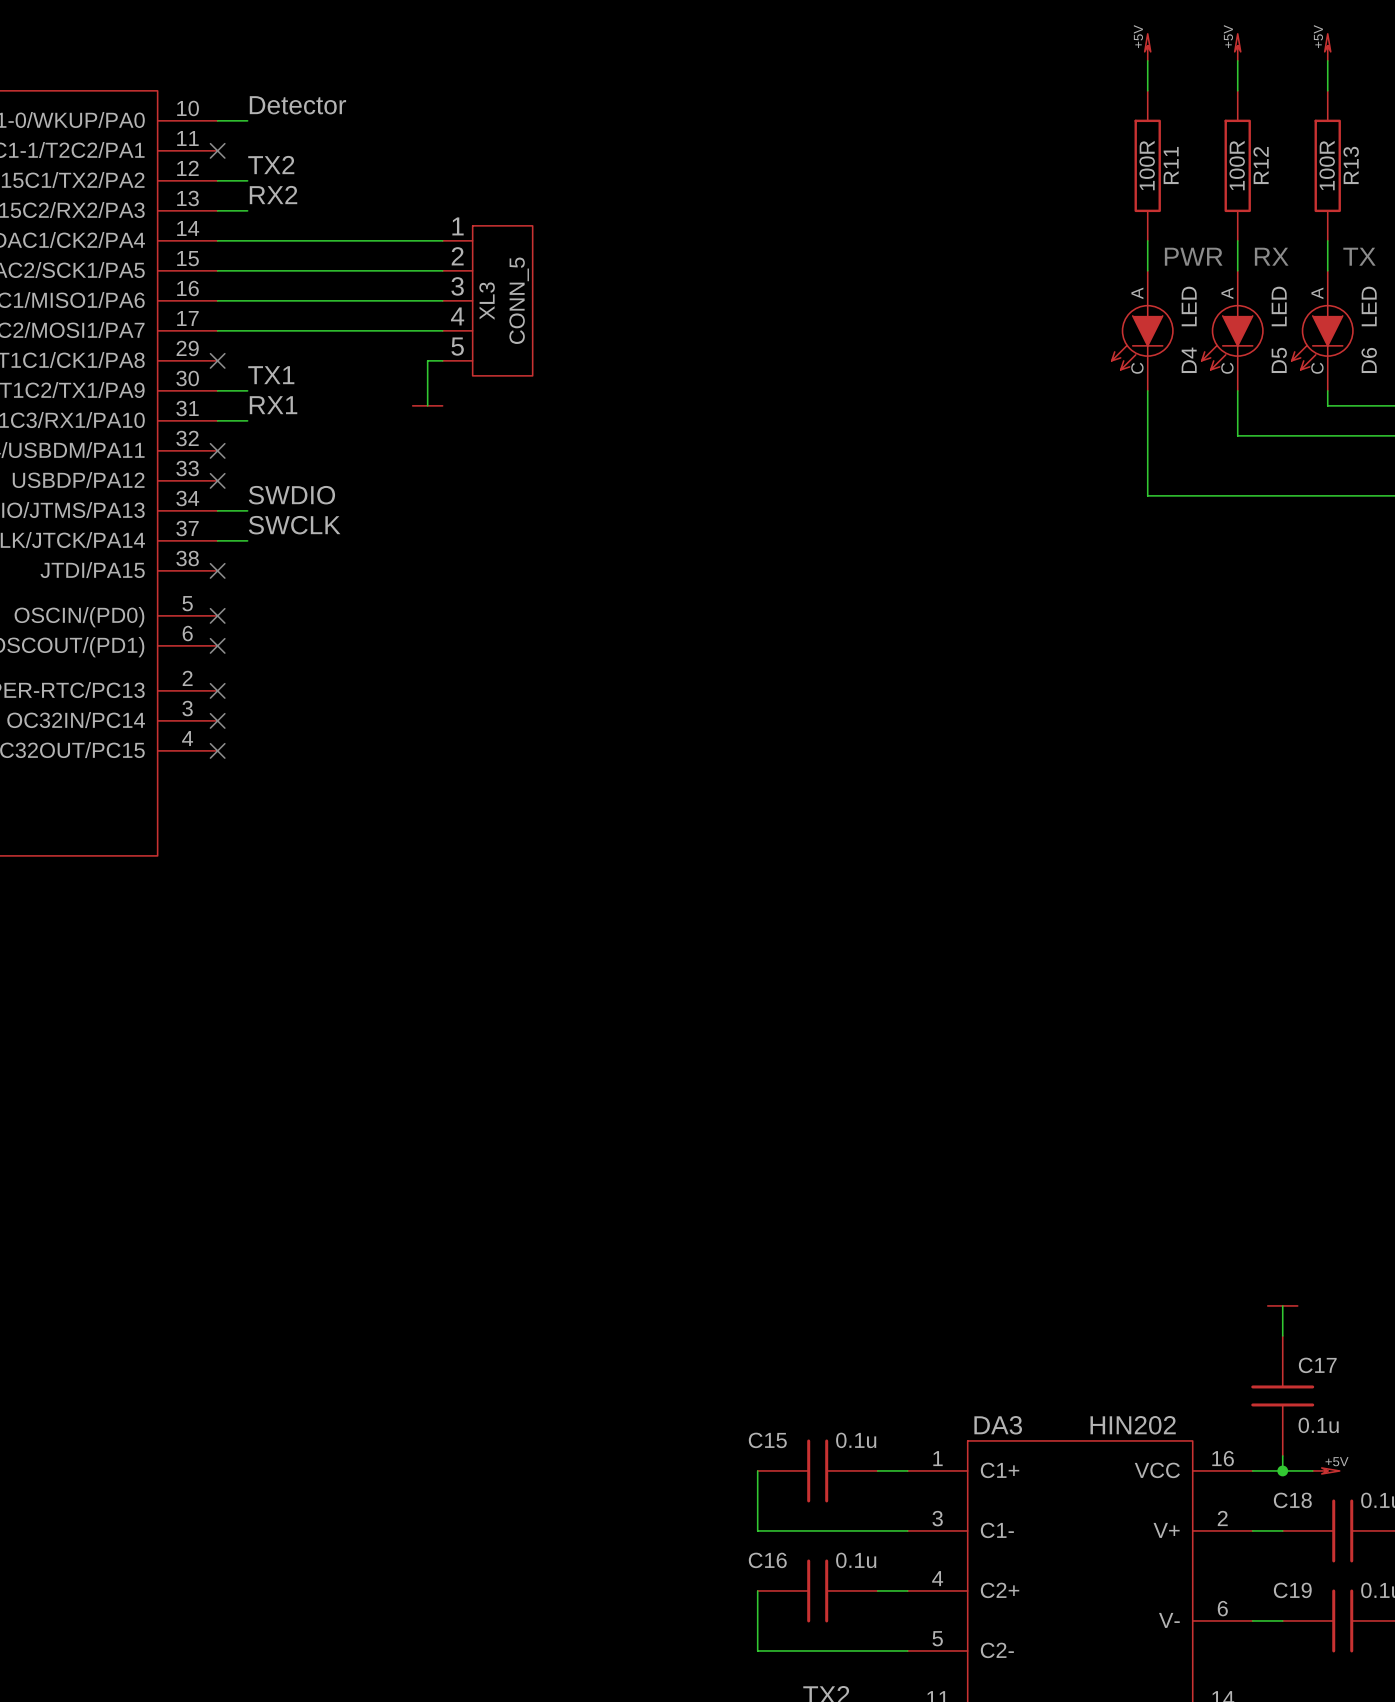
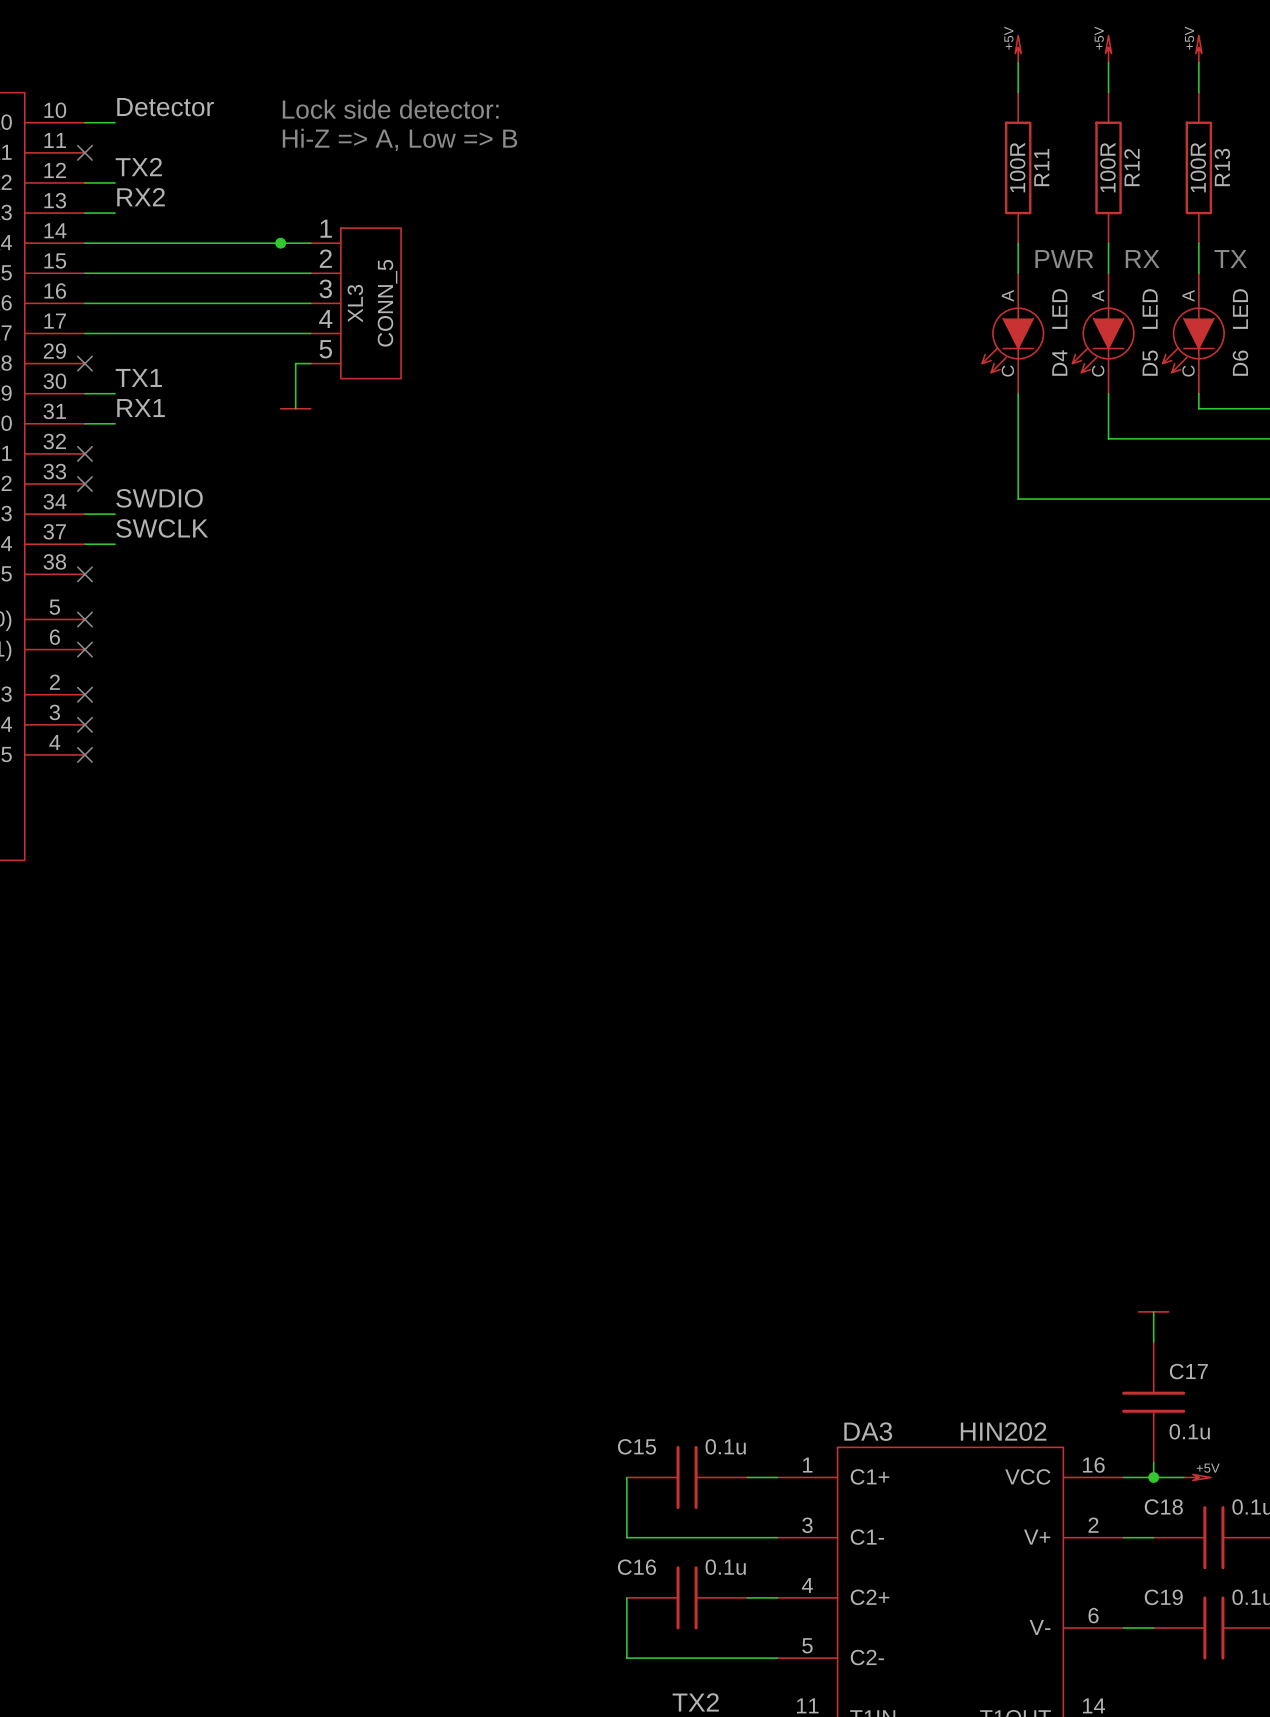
text: none -> Lock side detector: (390, 109)
text: none -> Hi-Z => A, Low => B (399, 139)
junction: none -> (280, 243)

